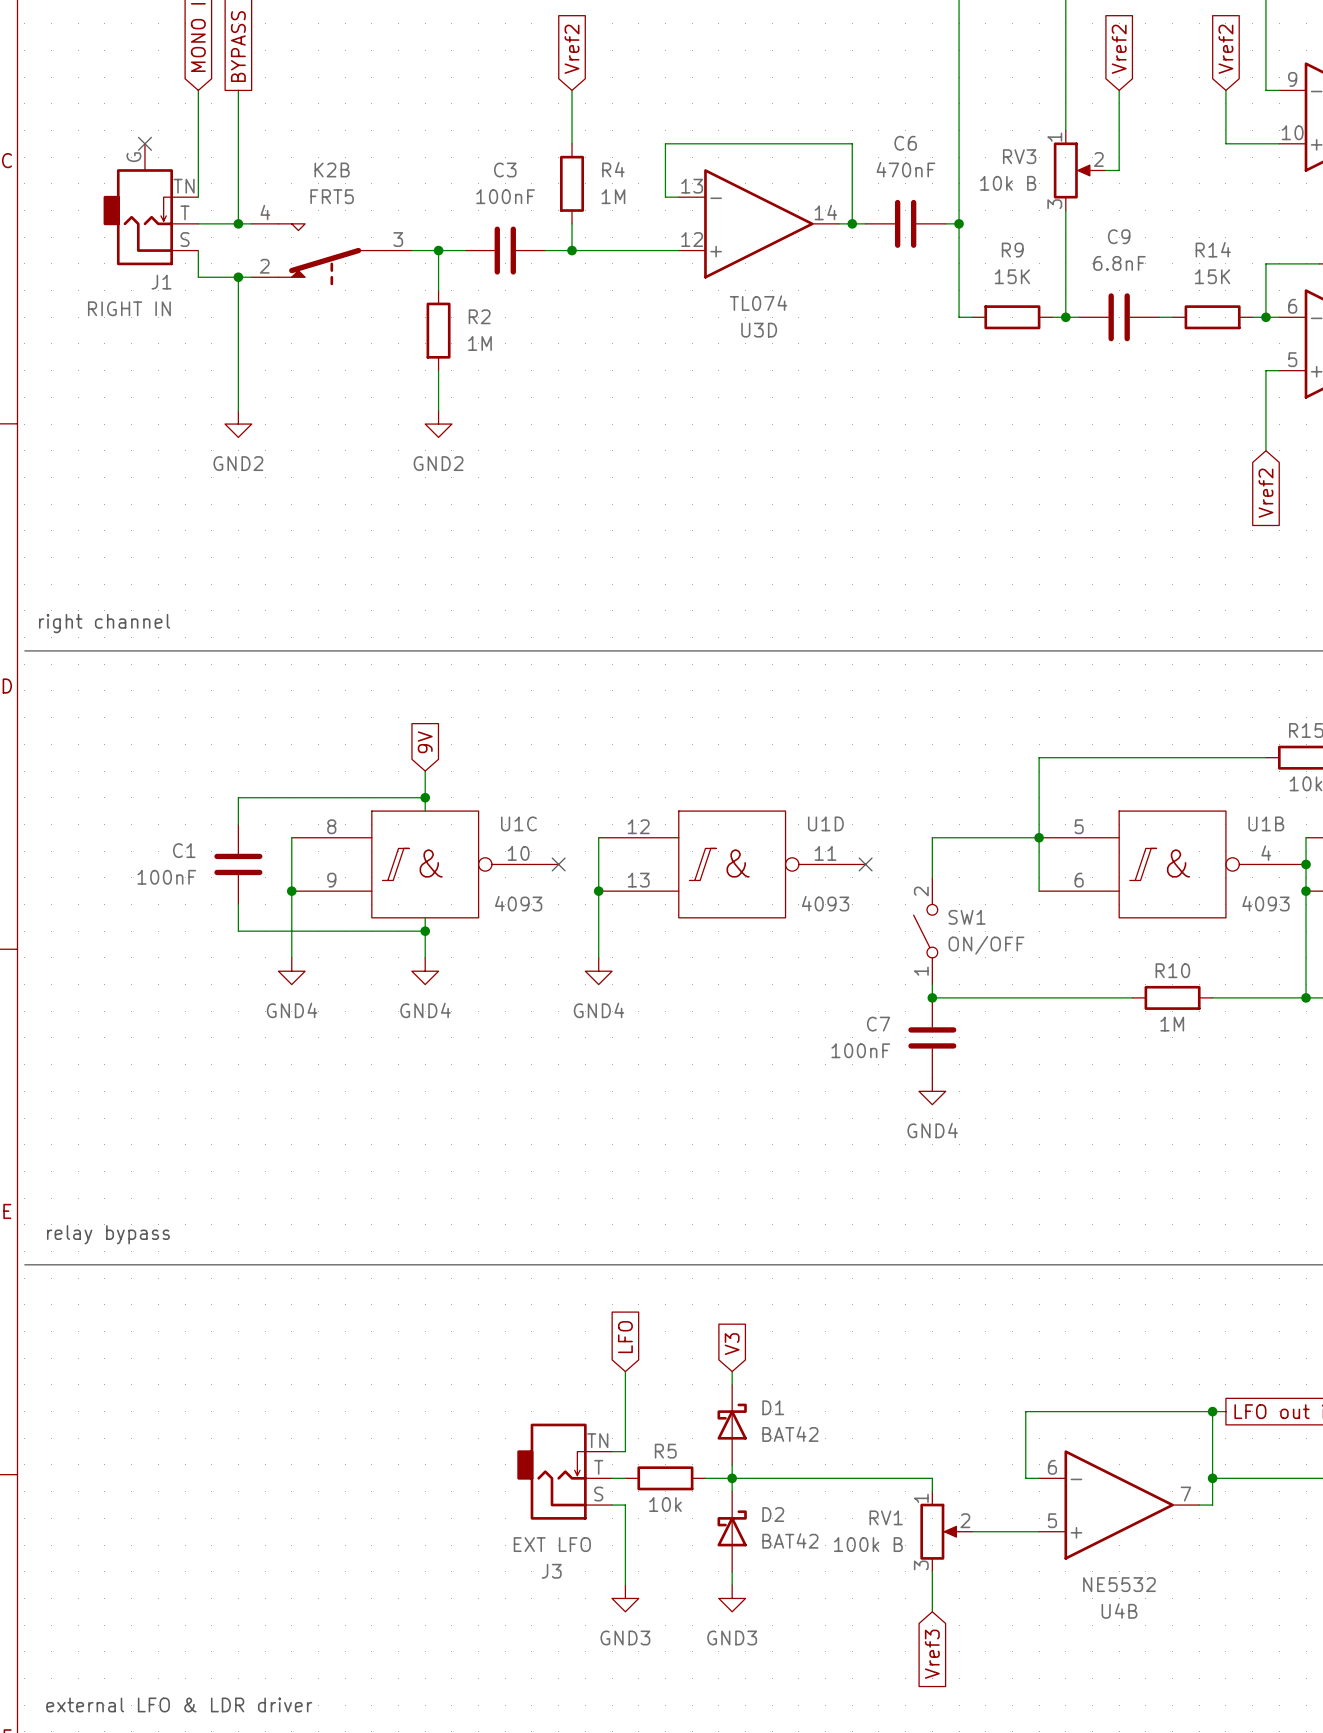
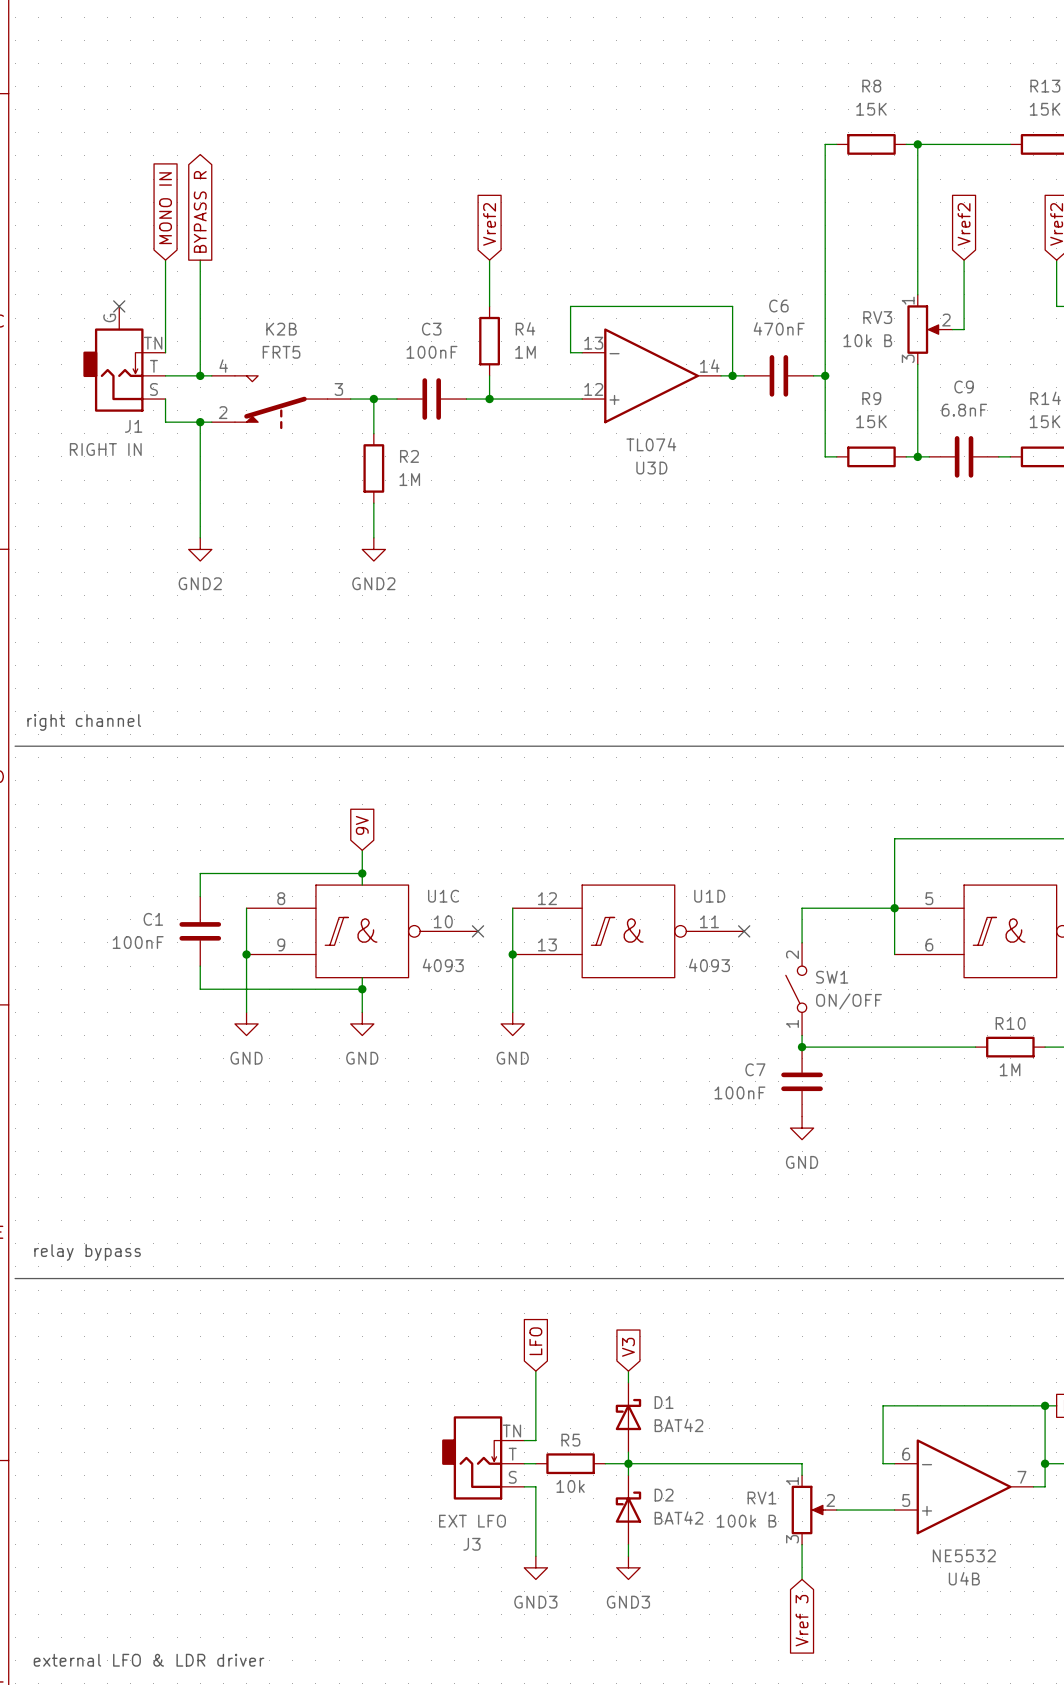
power symbol: GND4 (291, 971) -> GND (246, 1023)
power symbol: GND4 (425, 971) -> GND (362, 1023)
power symbol: GND4 (598, 971) -> GND (512, 1023)
power symbol: GND4 (932, 1091) -> GND (802, 1128)
global label: Vref3 (932, 1654) -> Vref 3 (802, 1620)

